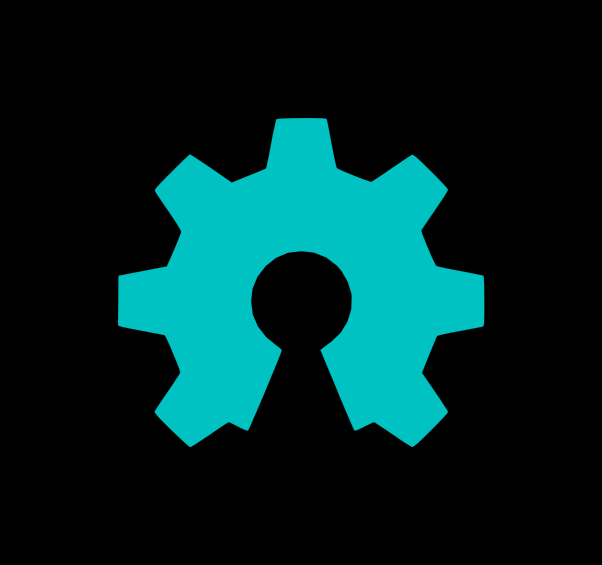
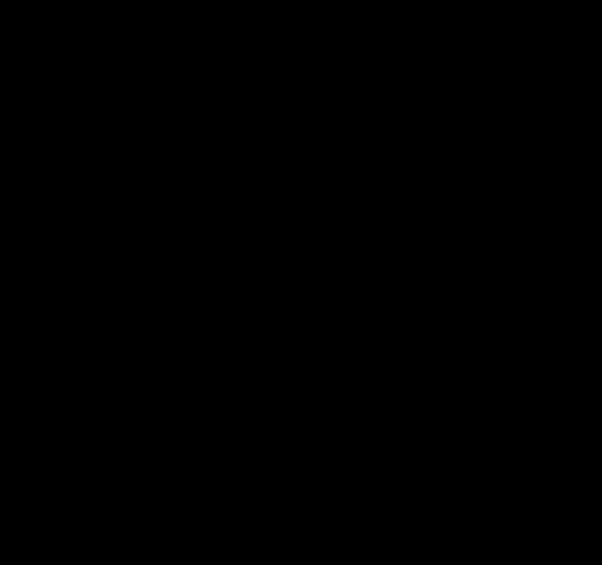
drawing: [117, 117, 485, 448] -> none

